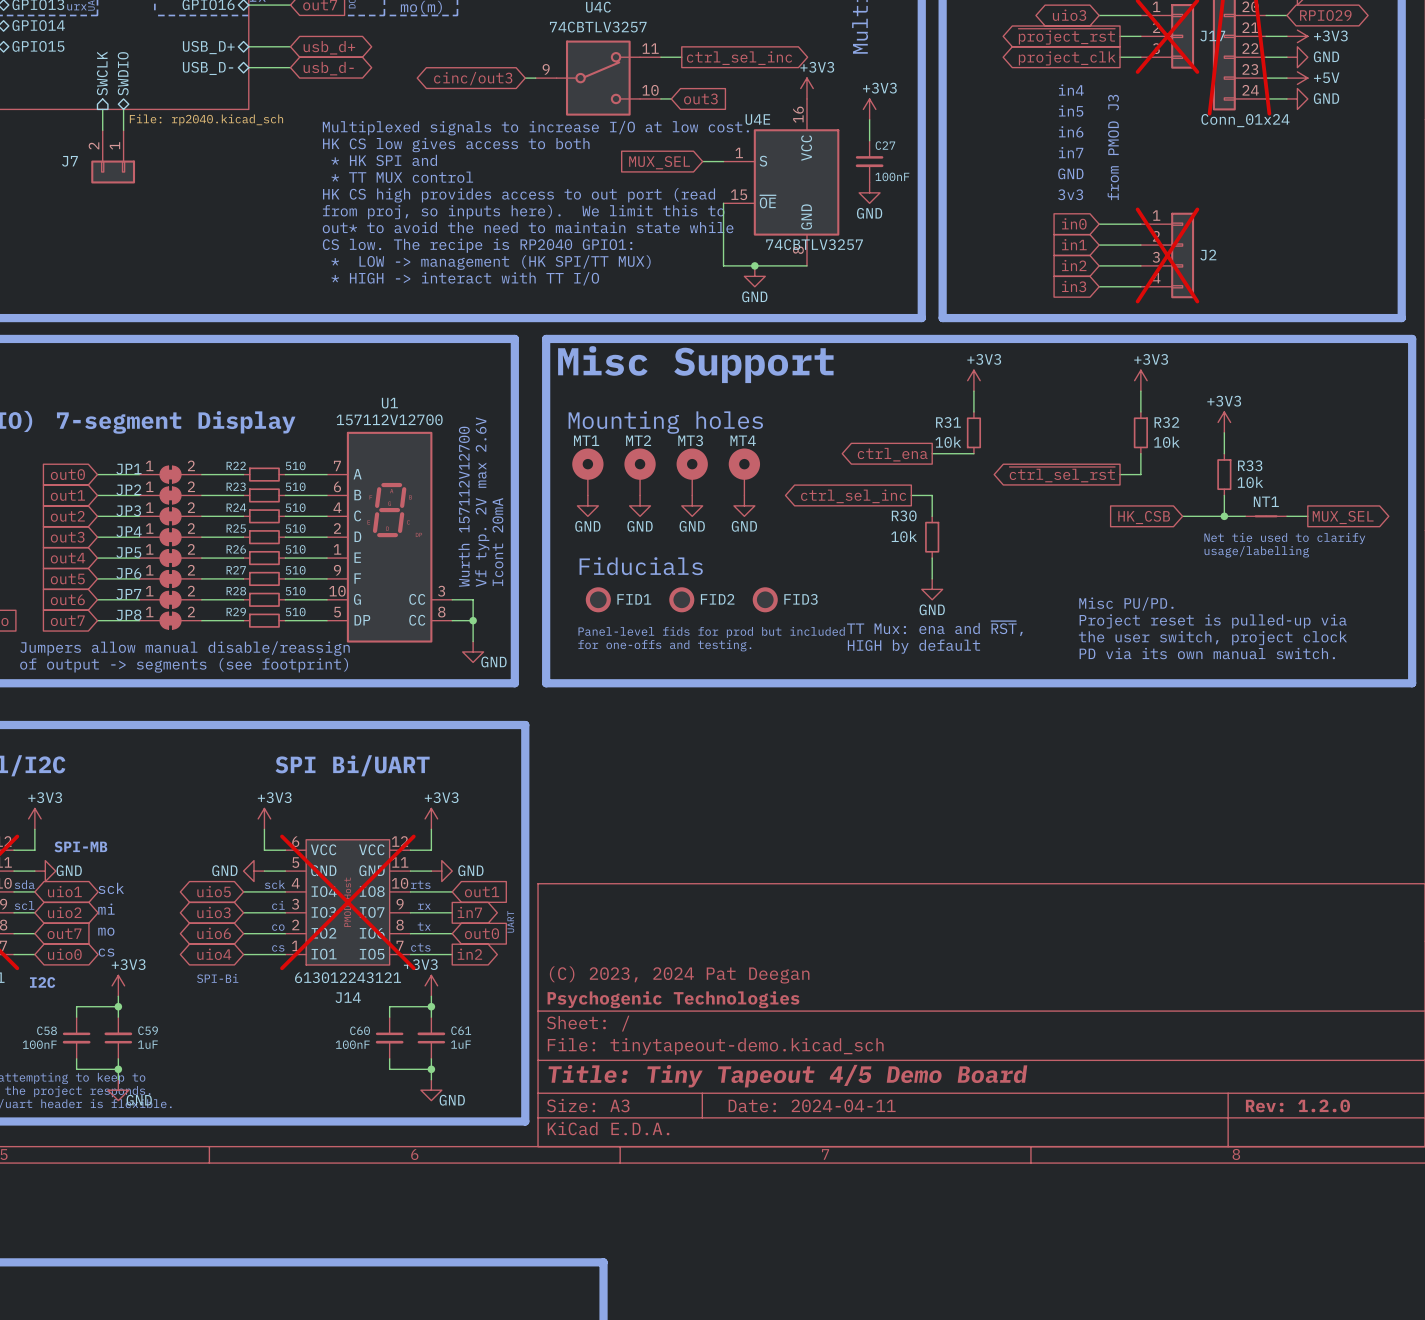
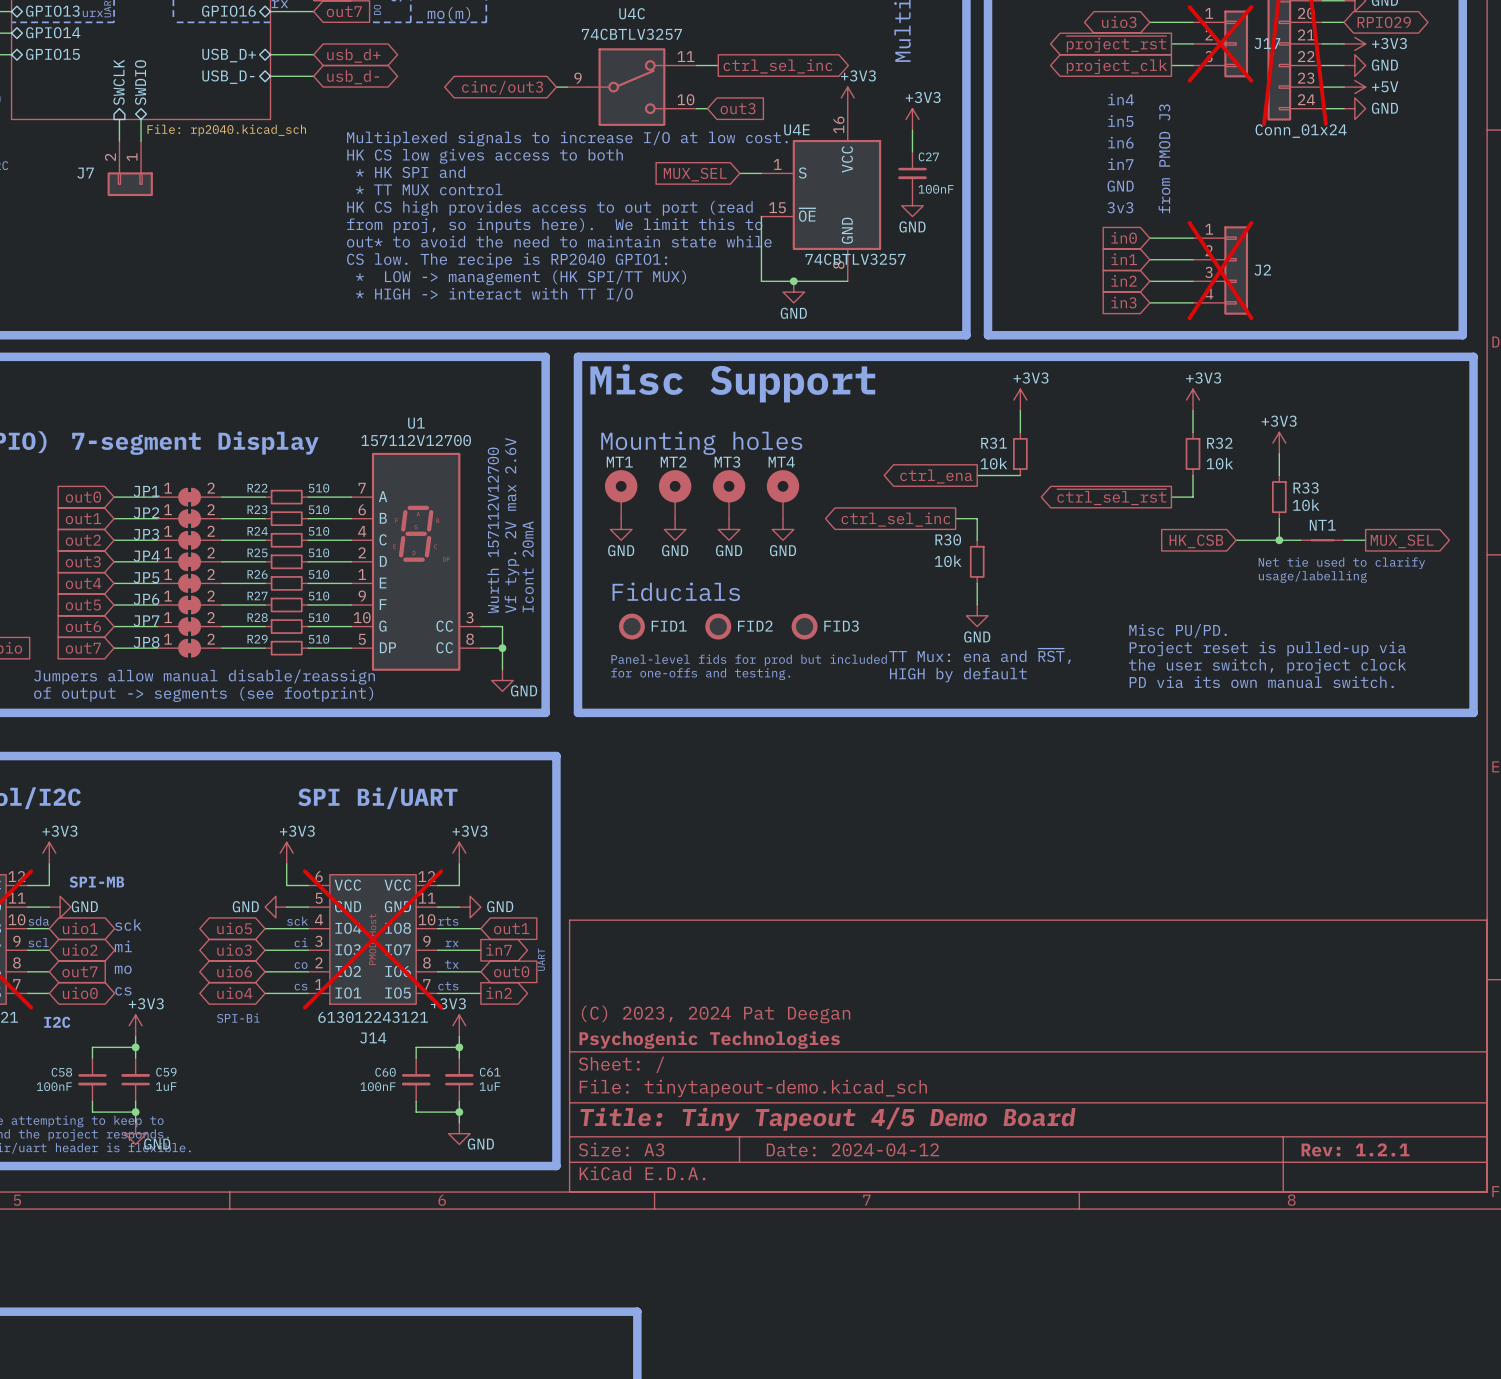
title block: Date: 2024-04-11 (812, 1105) -> Date: 2024-04-12 (852, 1149)
title block: Rev: 1.2.0 (1297, 1105) -> Rev: 1.2.1 (1355, 1149)

